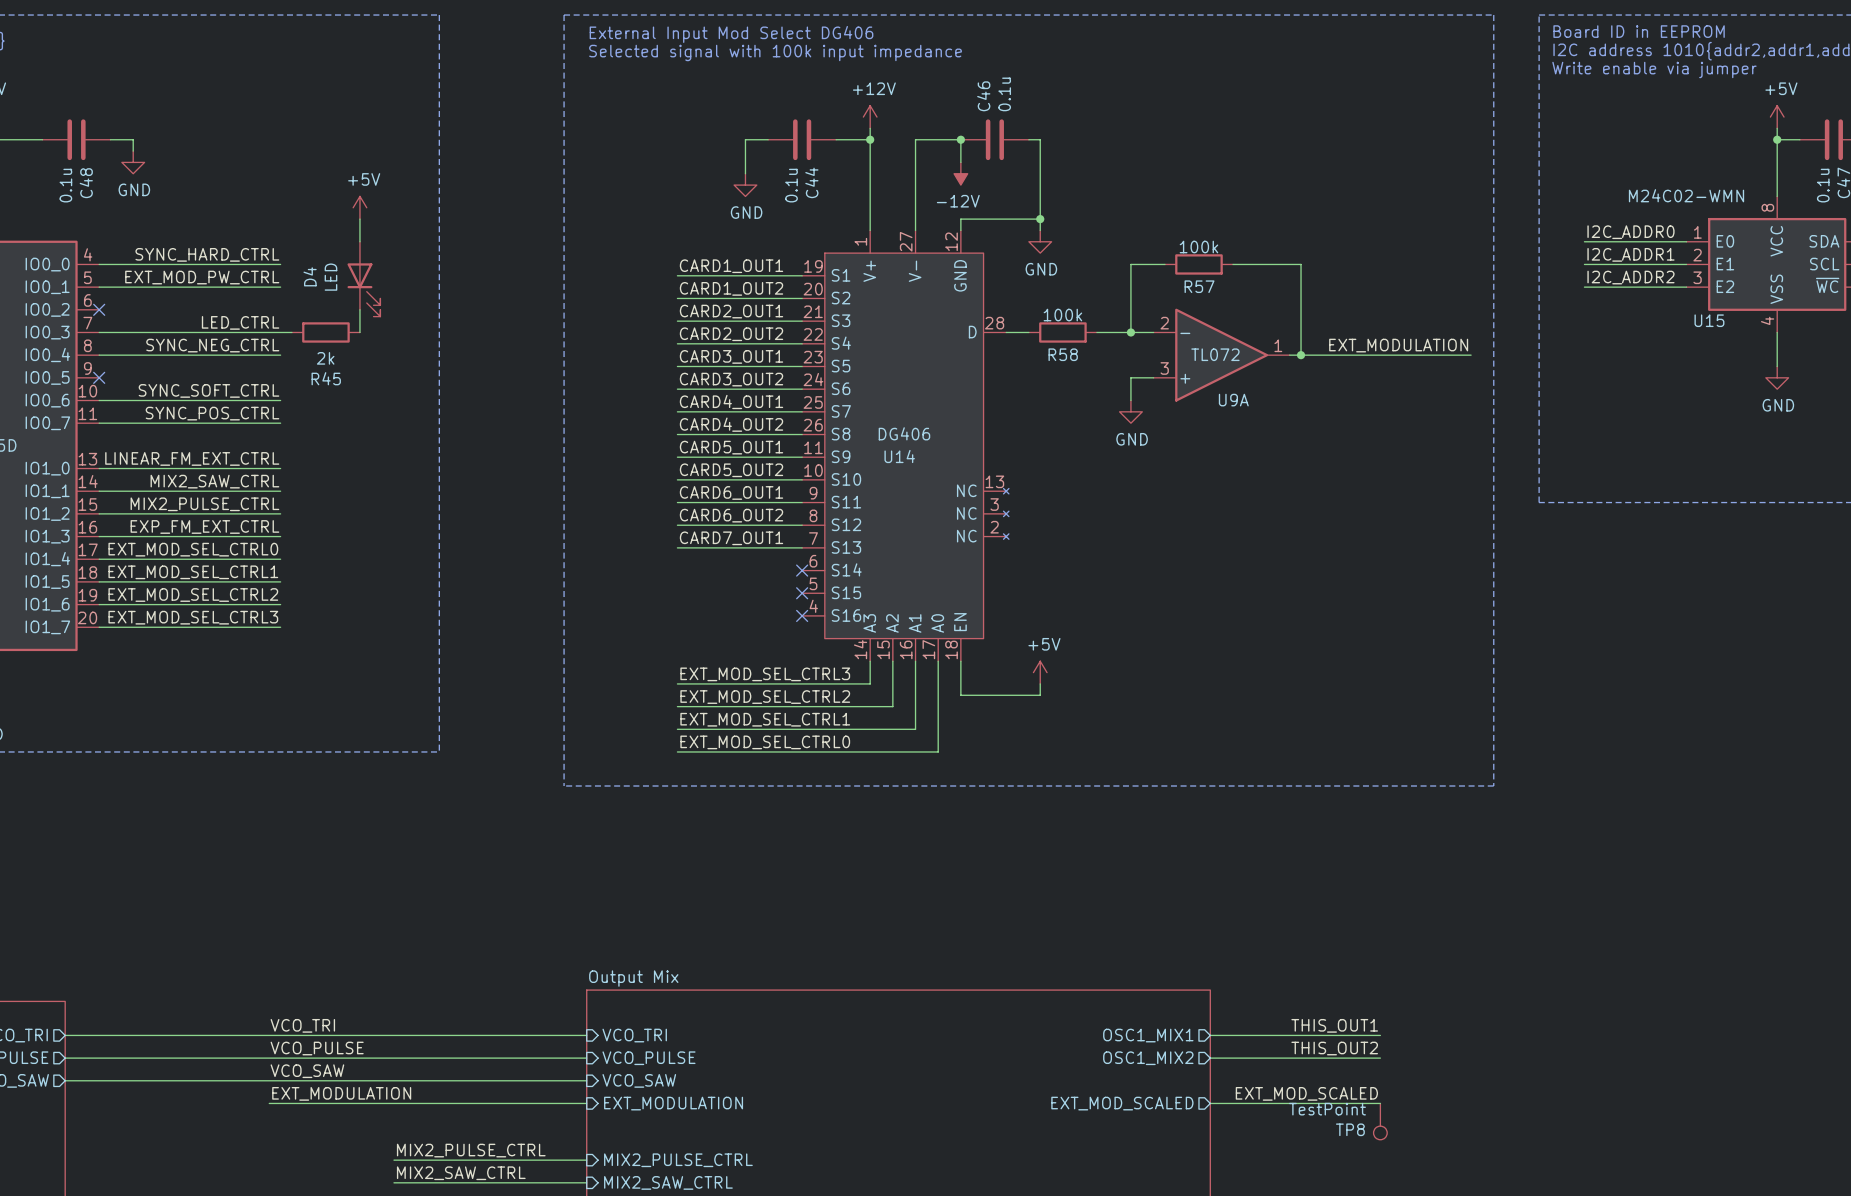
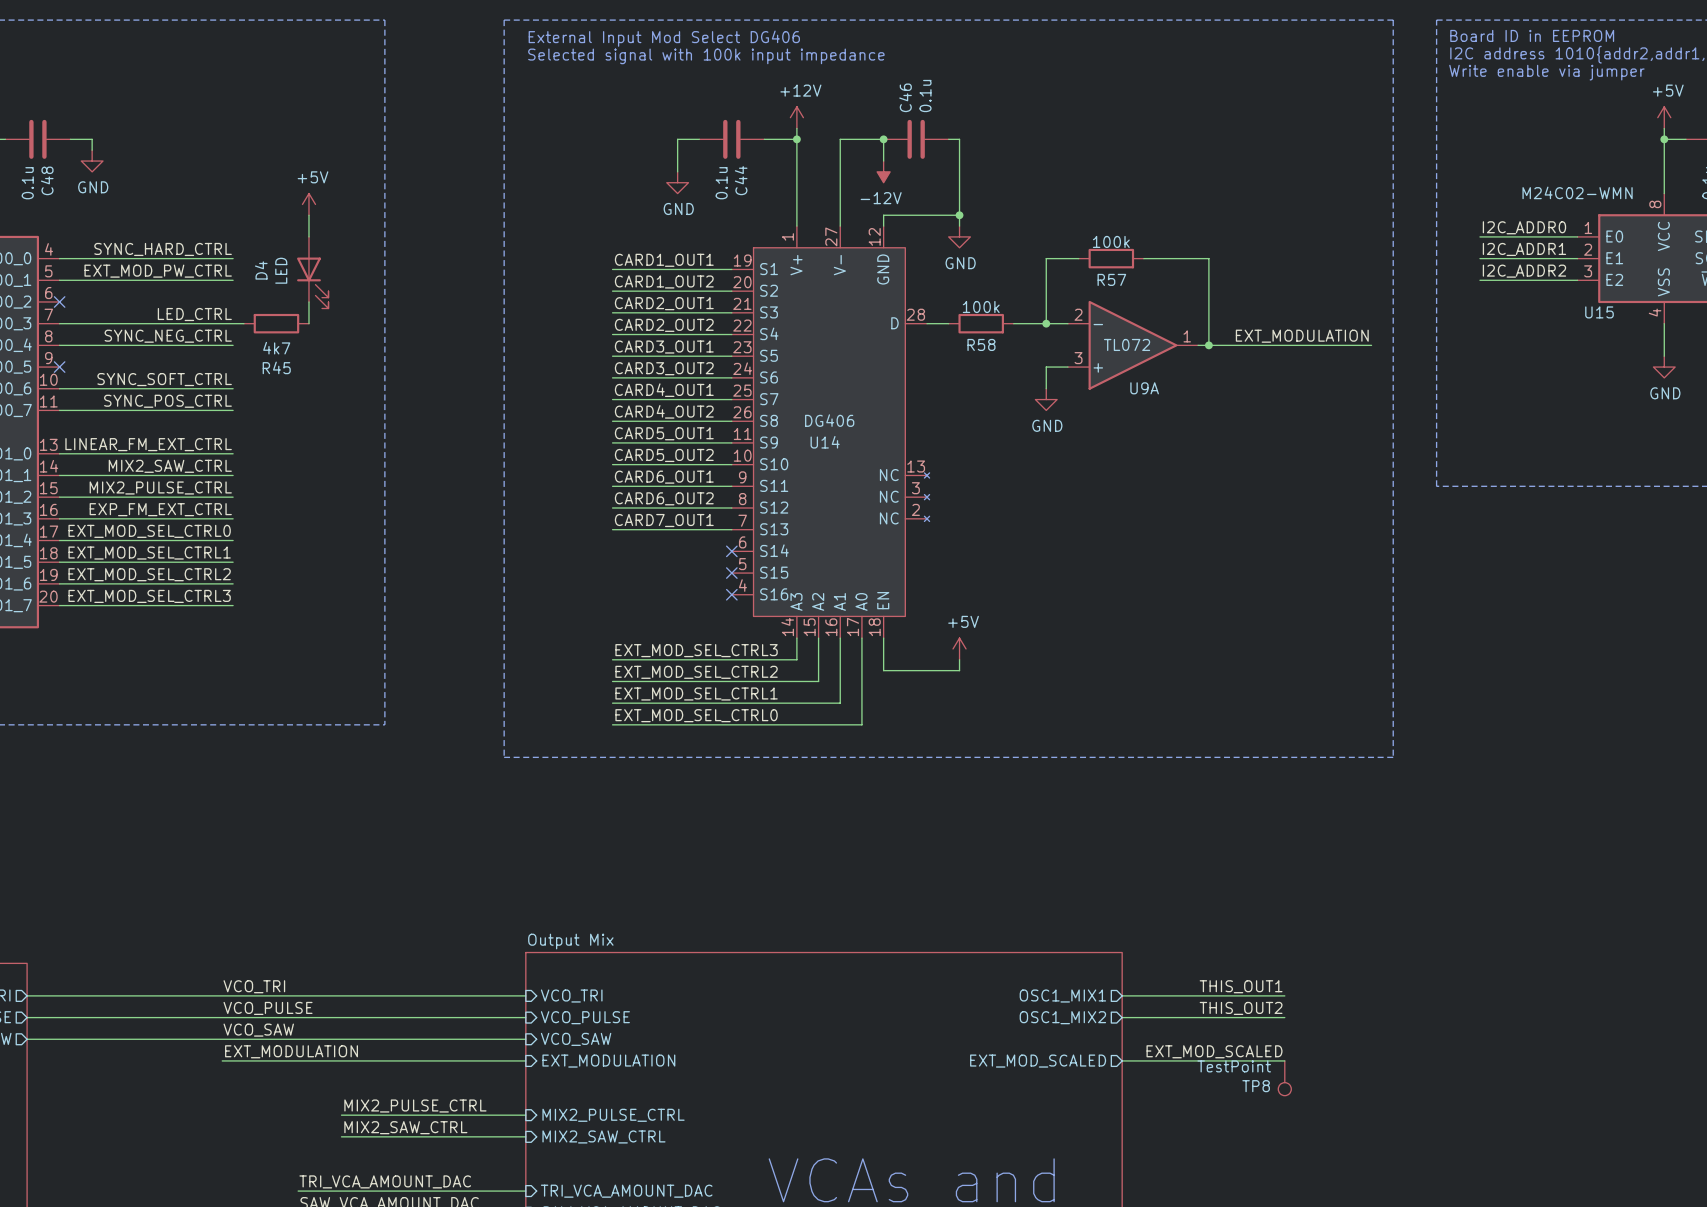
R45 value: 2k (325, 358) -> 4k7 (276, 348)

